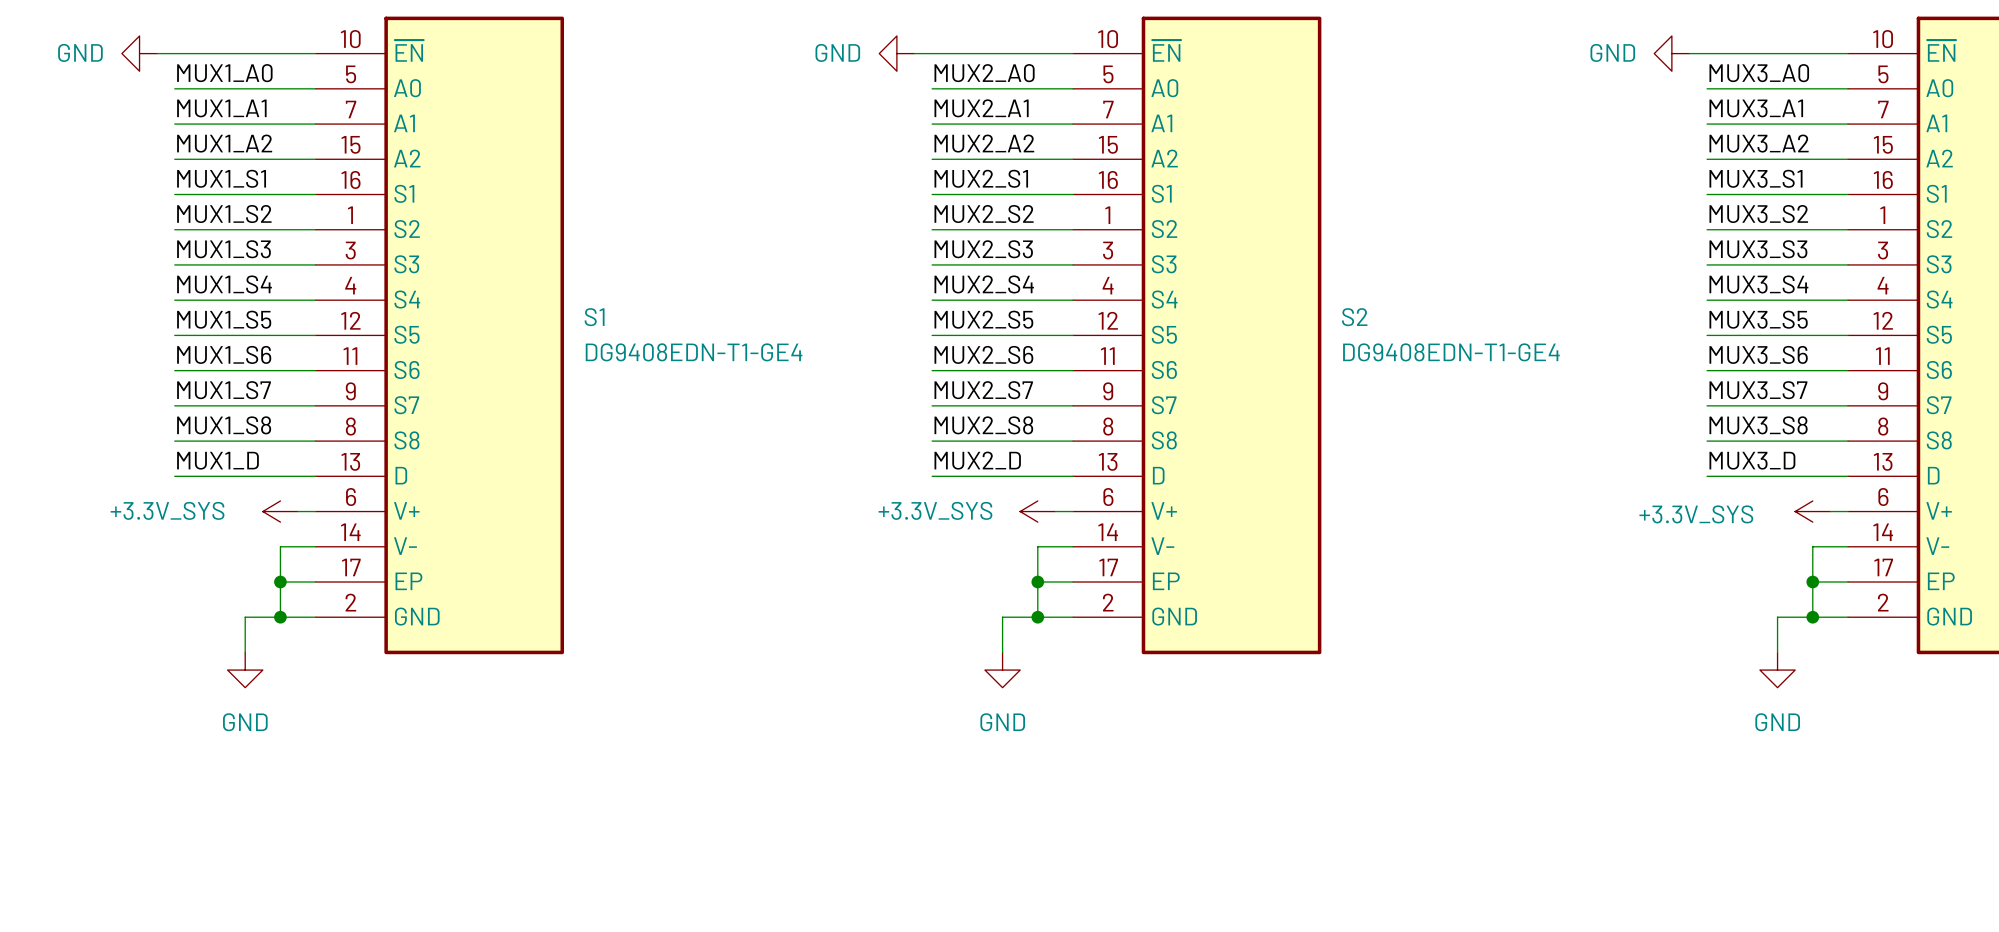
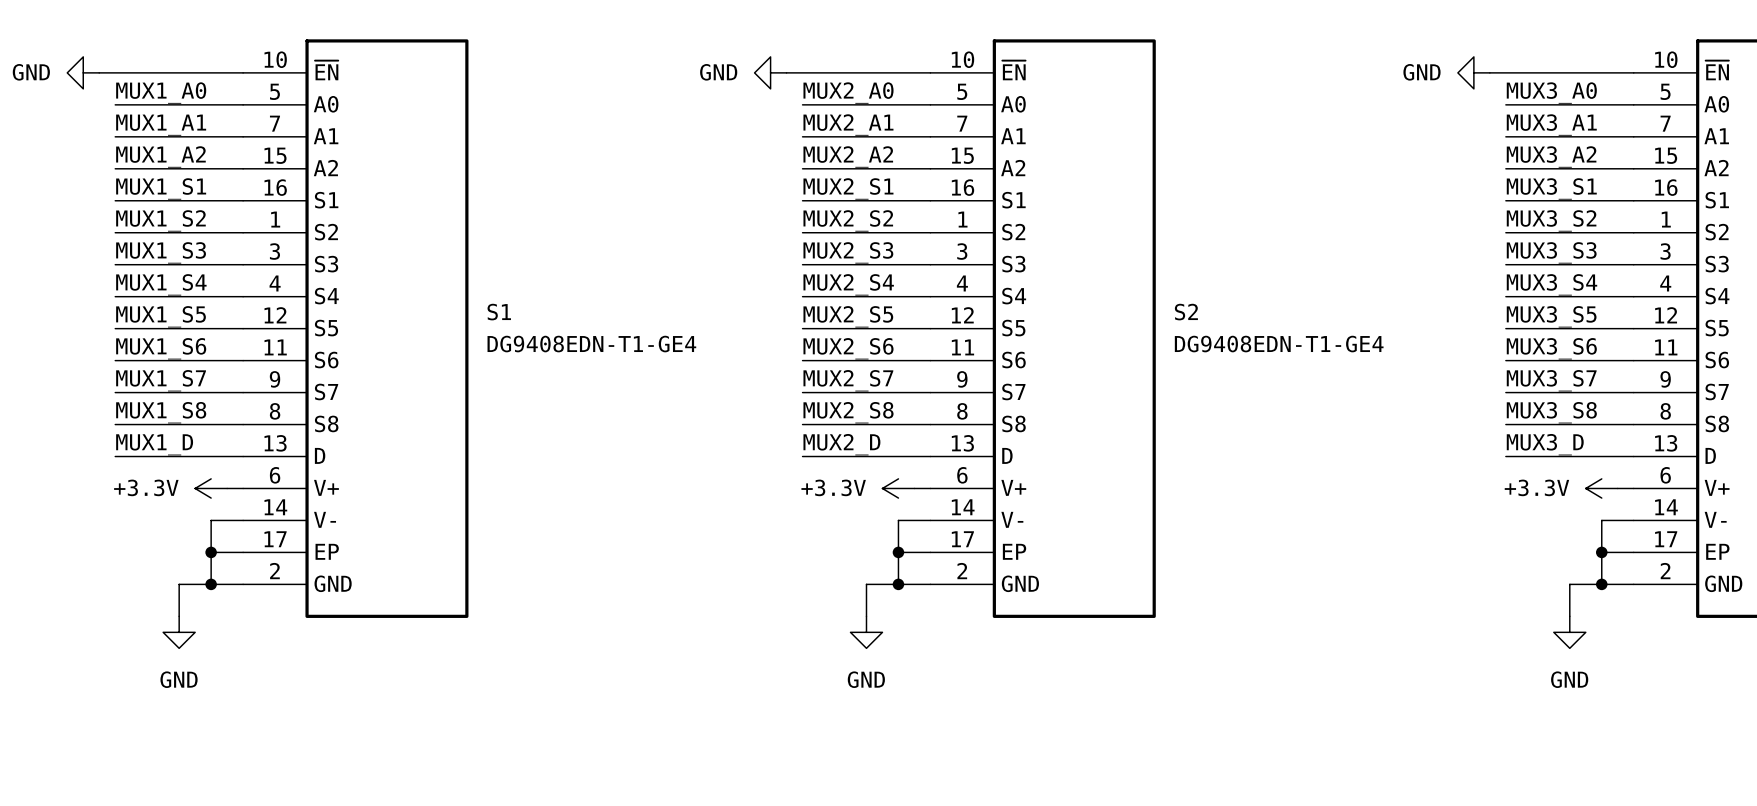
power symbol: +3.3V_SYS (280, 511) -> +3.3V (211, 488)
power symbol: +3.3V_SYS (1037, 511) -> +3.3V (898, 488)
power symbol: +3.3V_SYS (1812, 511) -> +3.3V (1601, 488)

